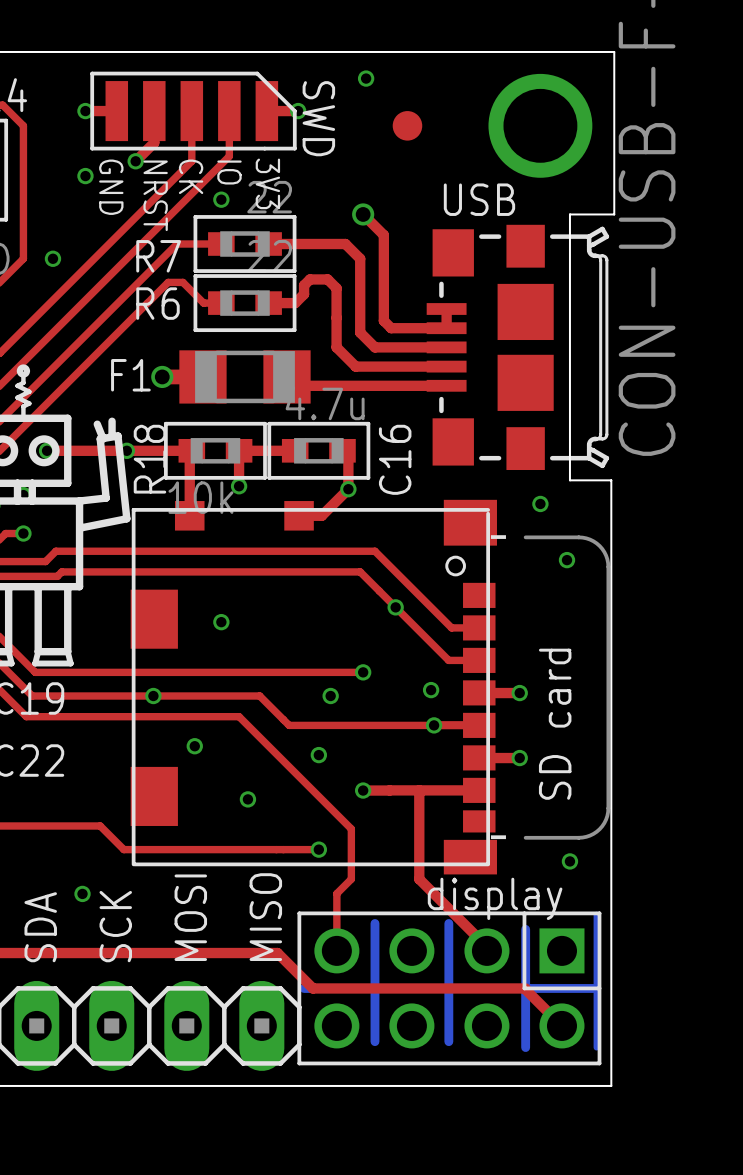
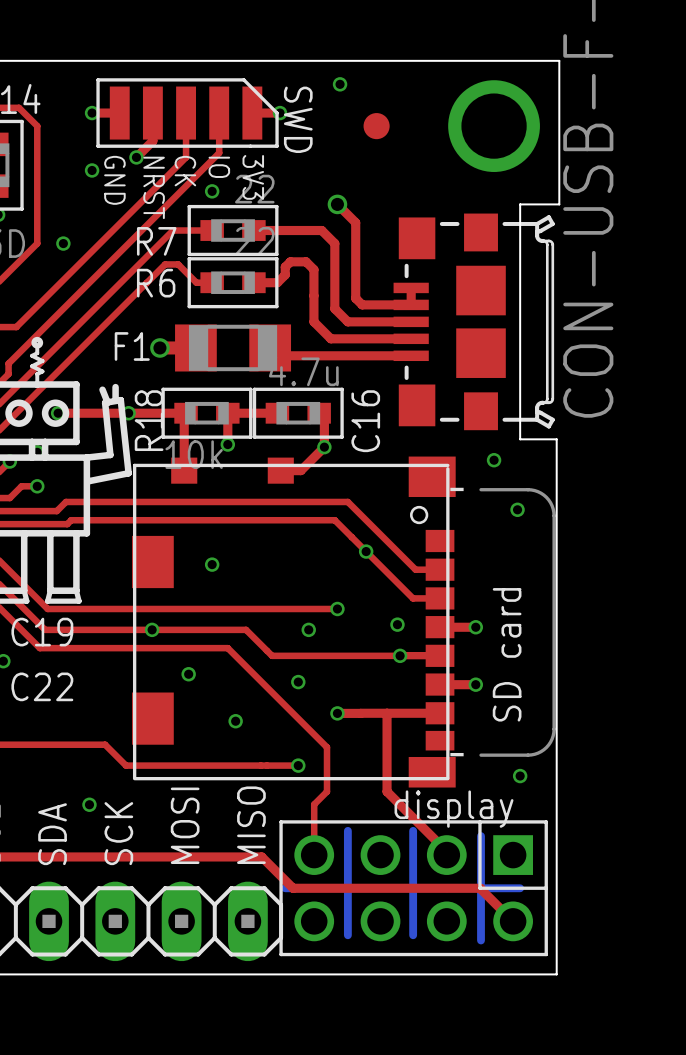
text: USB (479, 199) -> none
bottom track: (596, 914) (596, 1047) -> none
bottom track: (569, 988) (593, 988) -> none

